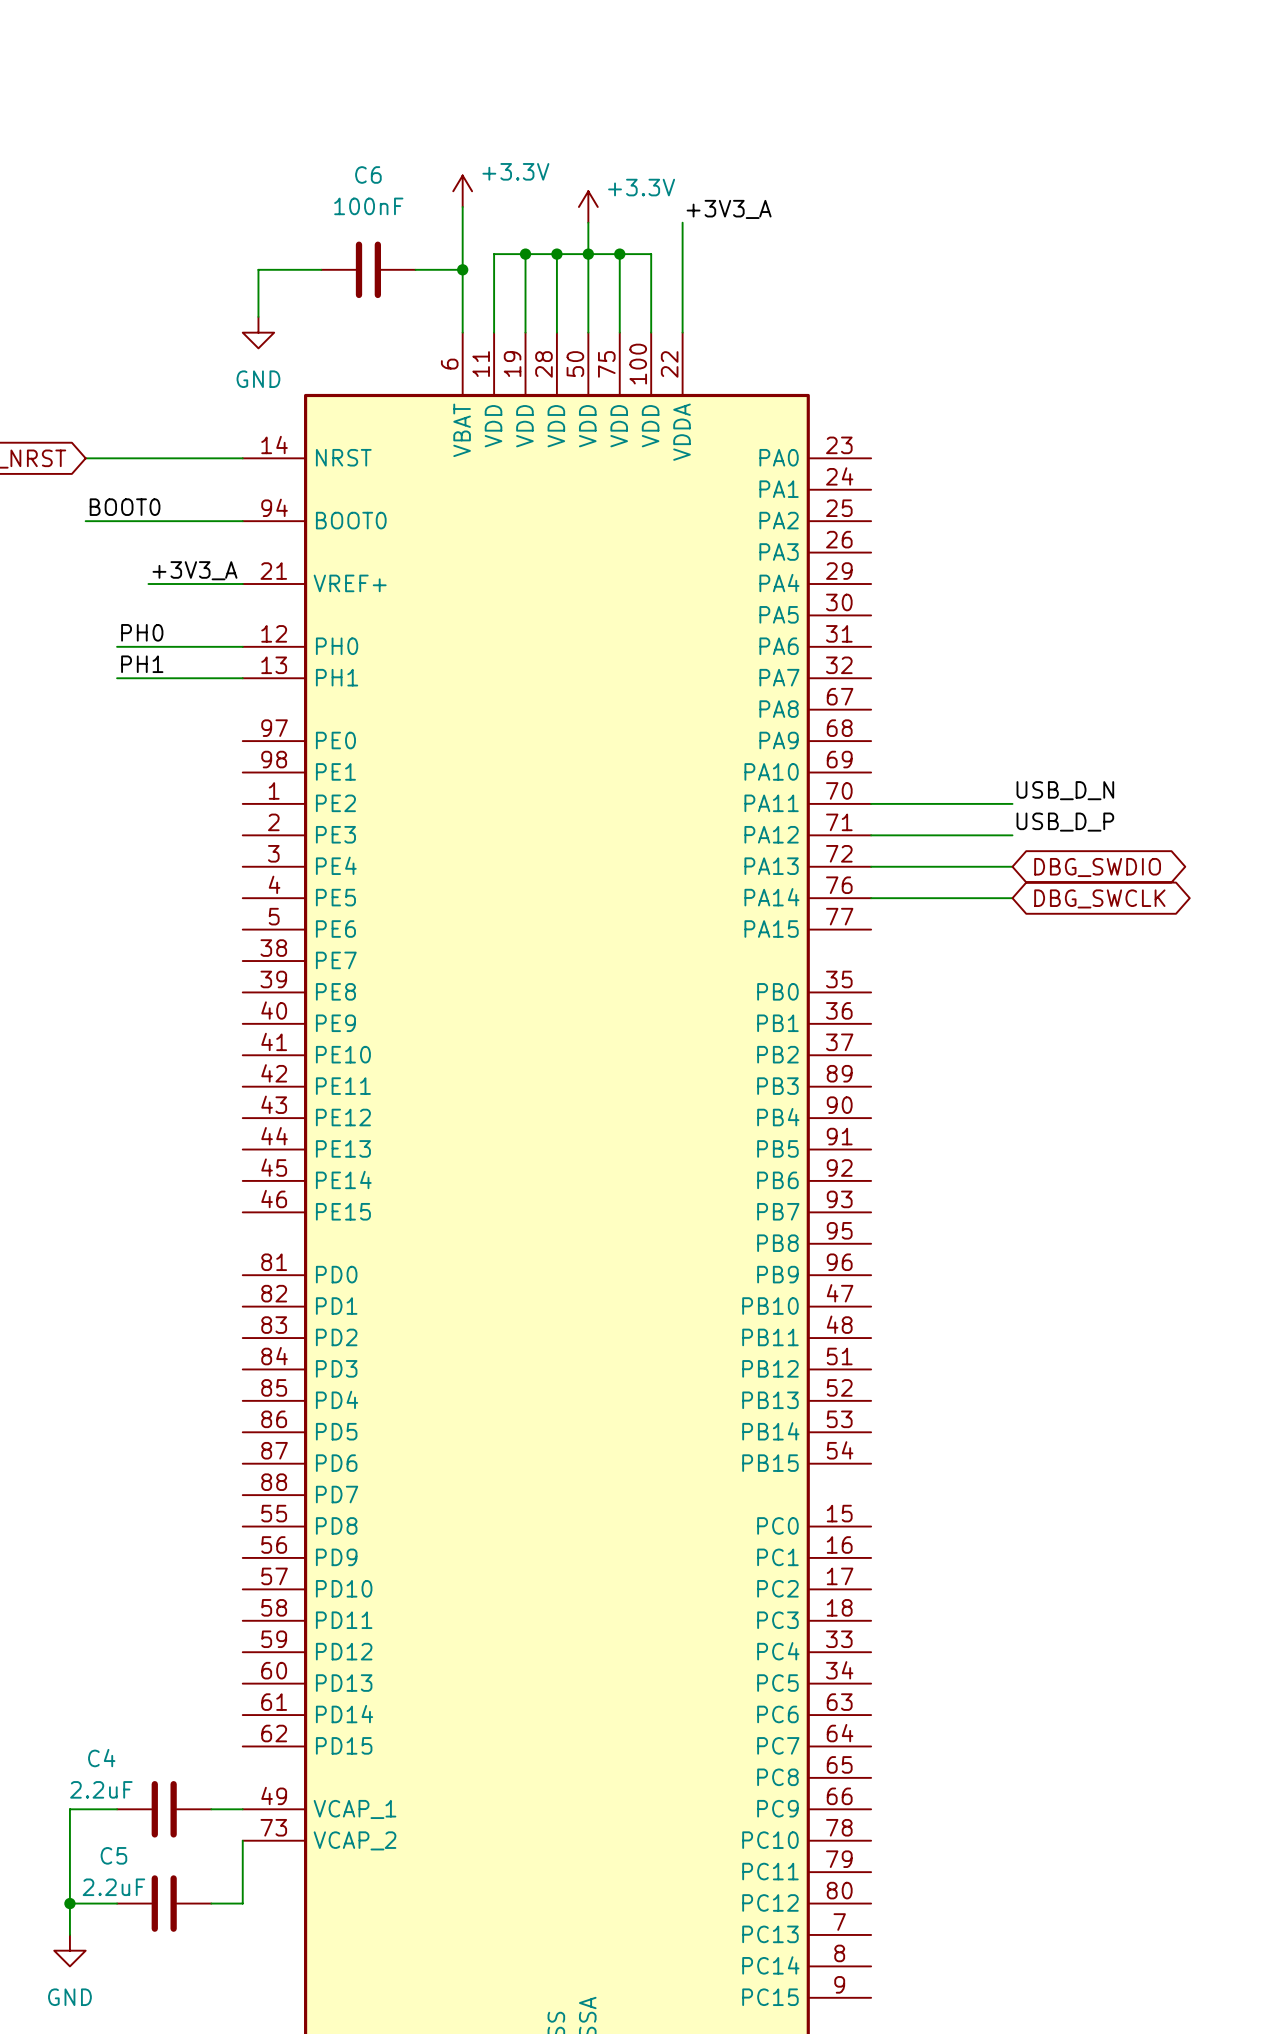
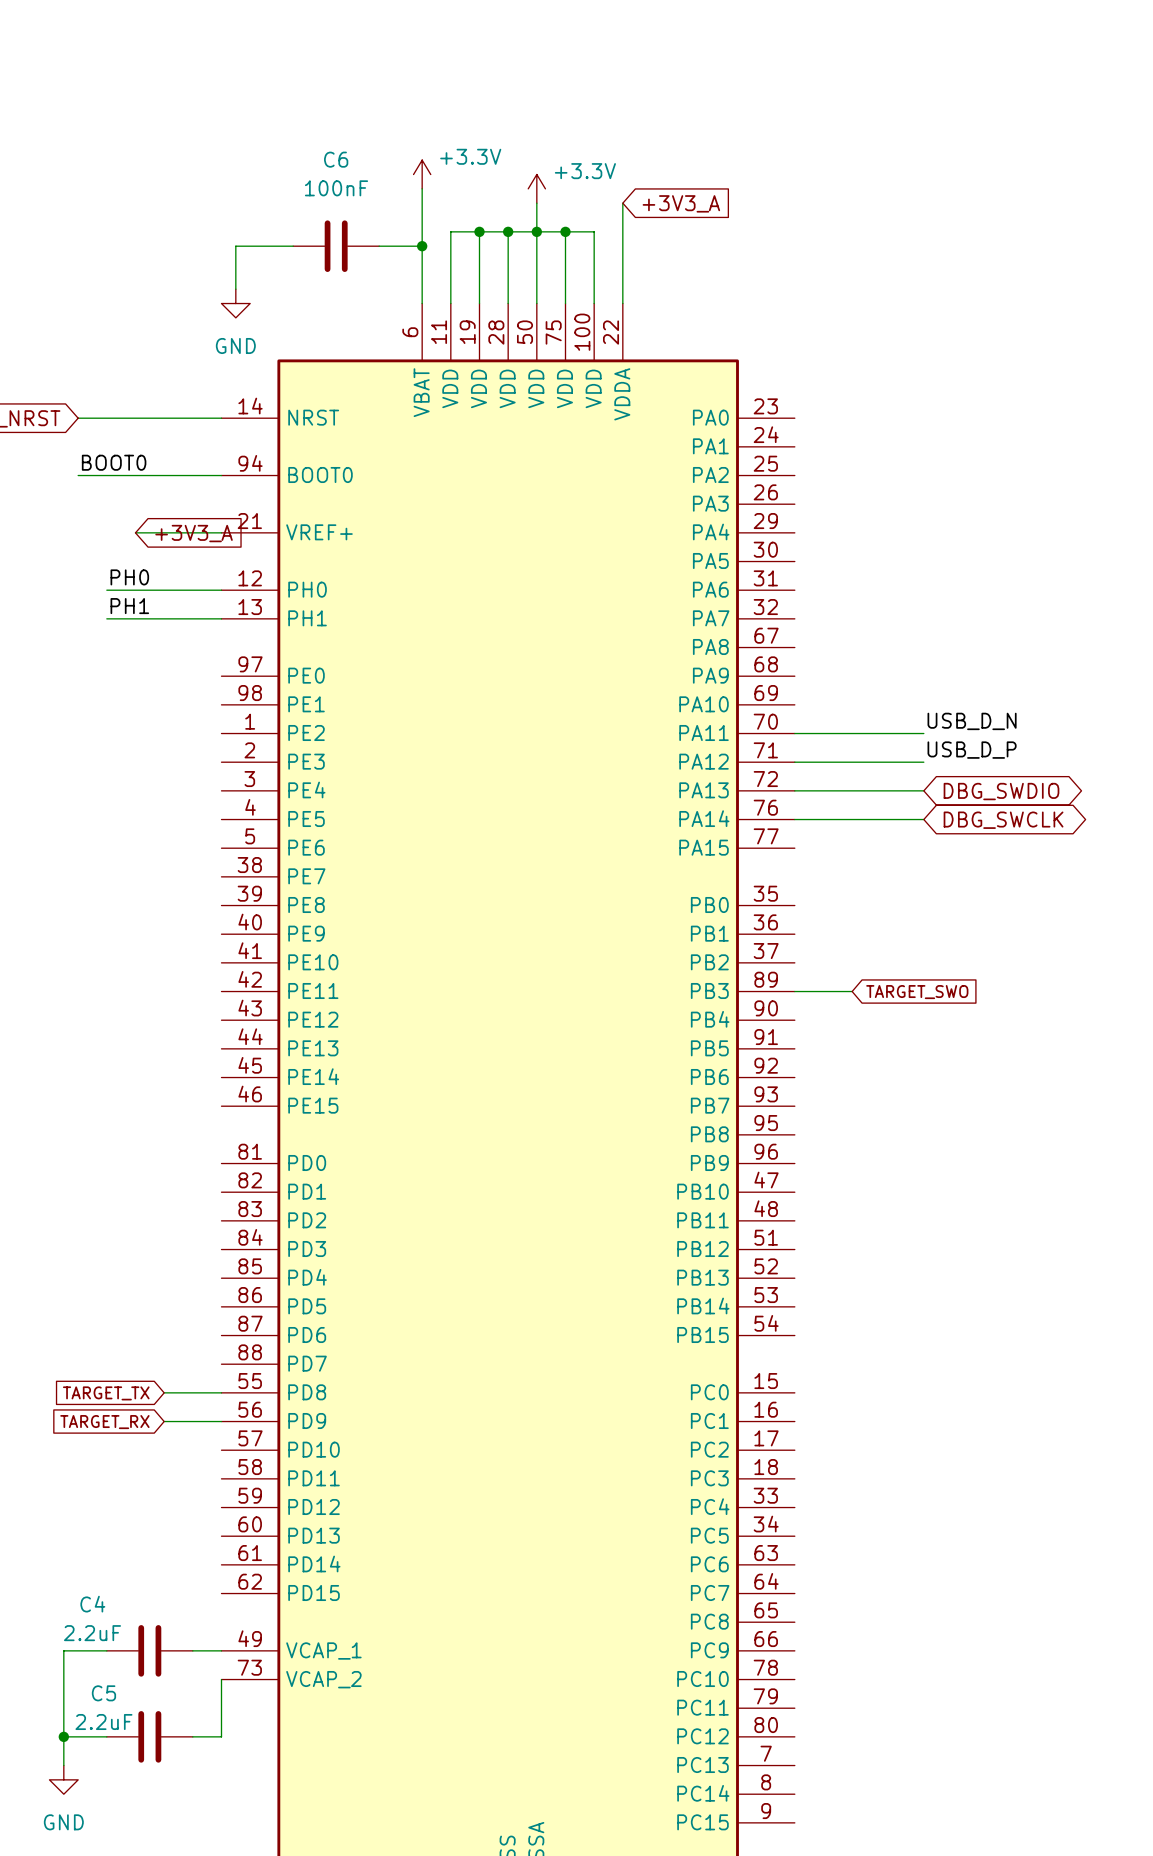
label: +3V3_A (729, 209) -> none
global label: none -> +3V3_A (681, 203)
label: +3V3_A (194, 570) -> none
global label: none -> +3V3_A (194, 533)
wire: none -> (794, 991) (852, 991)
global label: none -> TARGET_SWO (917, 992)
wire: none -> (164, 1392) (221, 1392)
global label: none -> TARGET_TX (106, 1393)
wire: none -> (164, 1421) (221, 1421)
global label: none -> TARGET_RX (104, 1422)

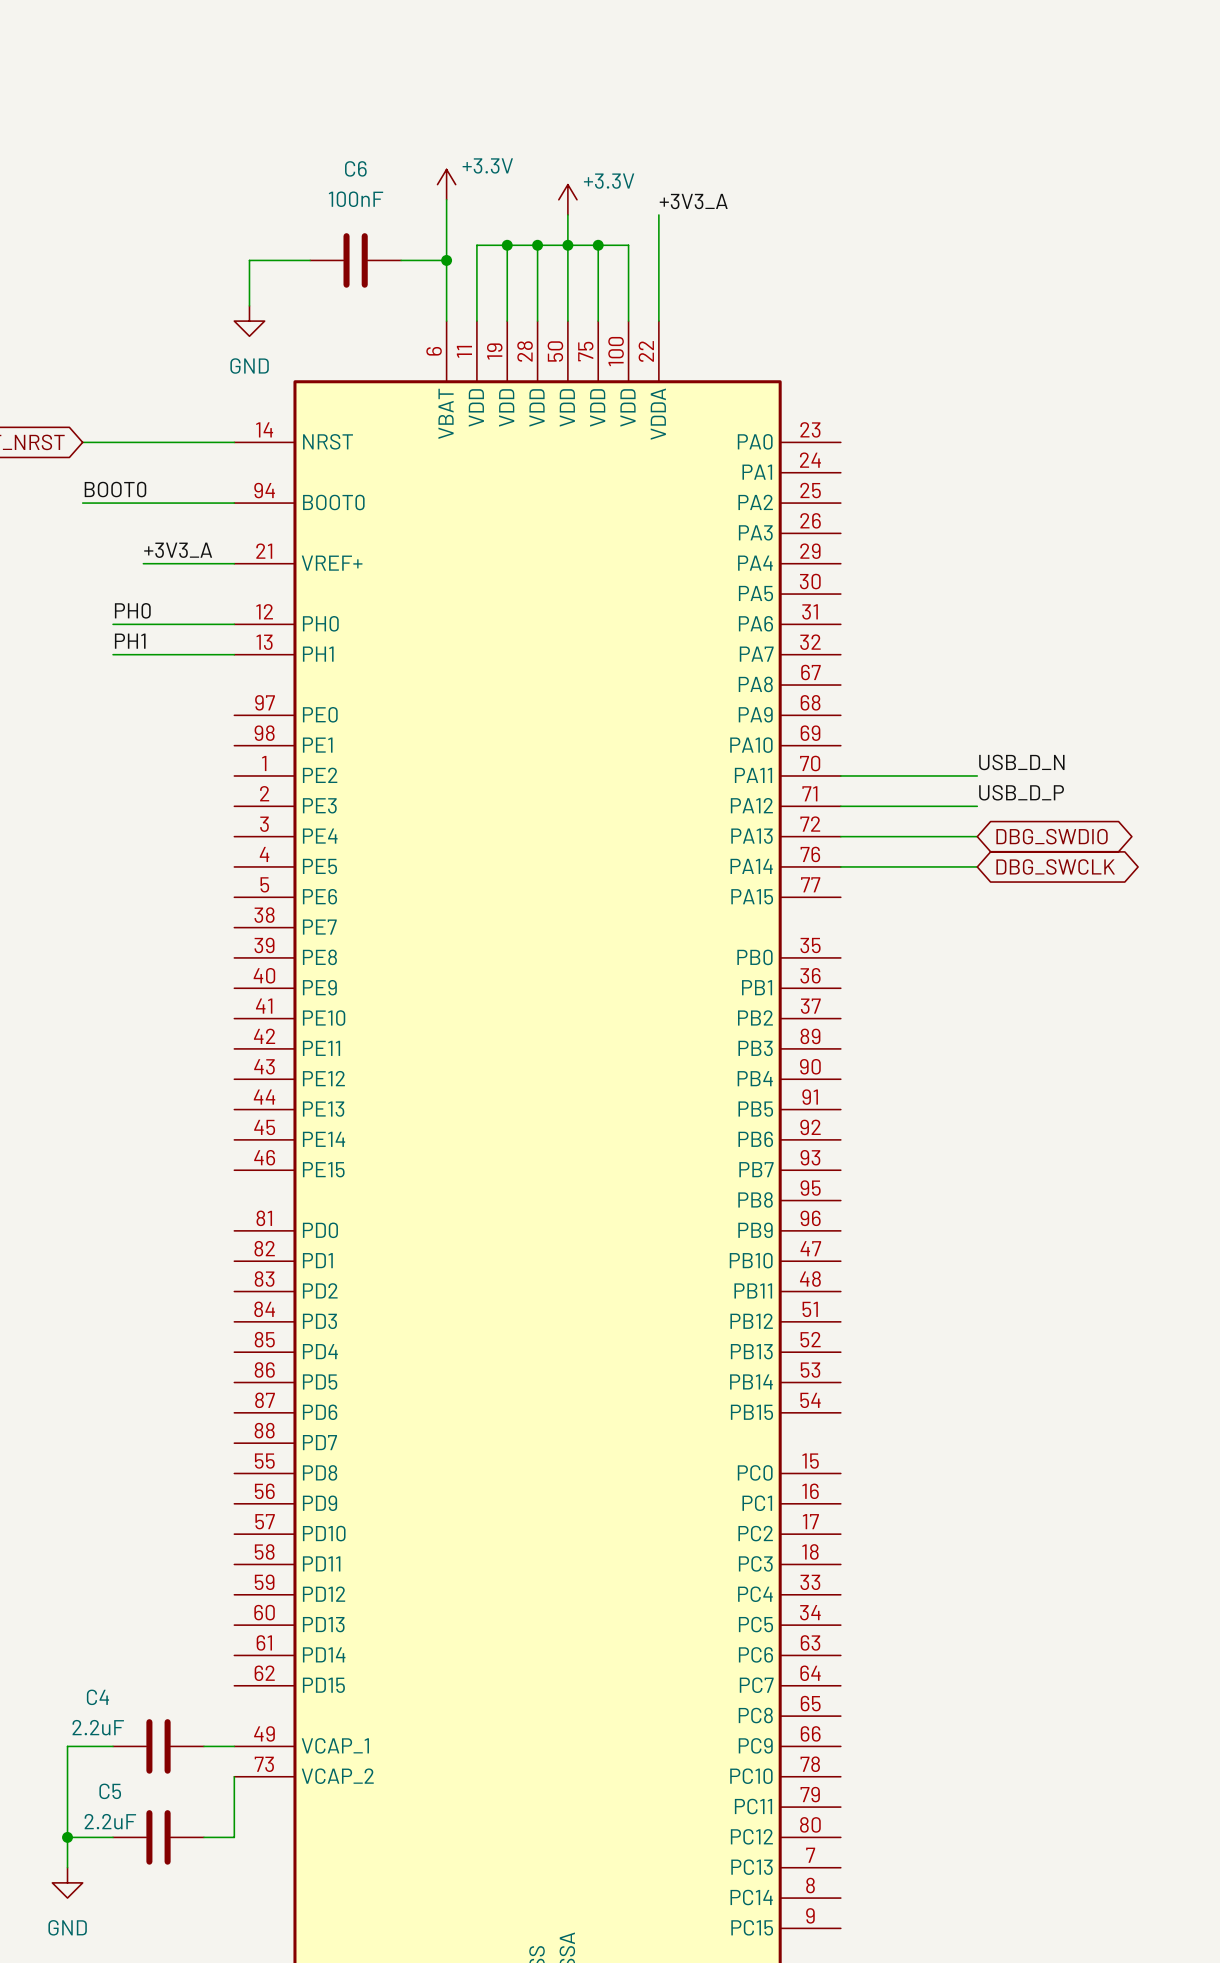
label: none -> +3V3_A (693, 201)
global label: +3V3_A (681, 203) -> none
label: none -> +3V3_A (178, 550)
global label: +3V3_A (194, 533) -> none
wire: (794, 991) (852, 991) -> none
global label: TARGET_SWO (917, 992) -> none
wire: (164, 1392) (221, 1392) -> none
global label: TARGET_TX (106, 1393) -> none
wire: (164, 1421) (221, 1421) -> none
global label: TARGET_RX (104, 1422) -> none

